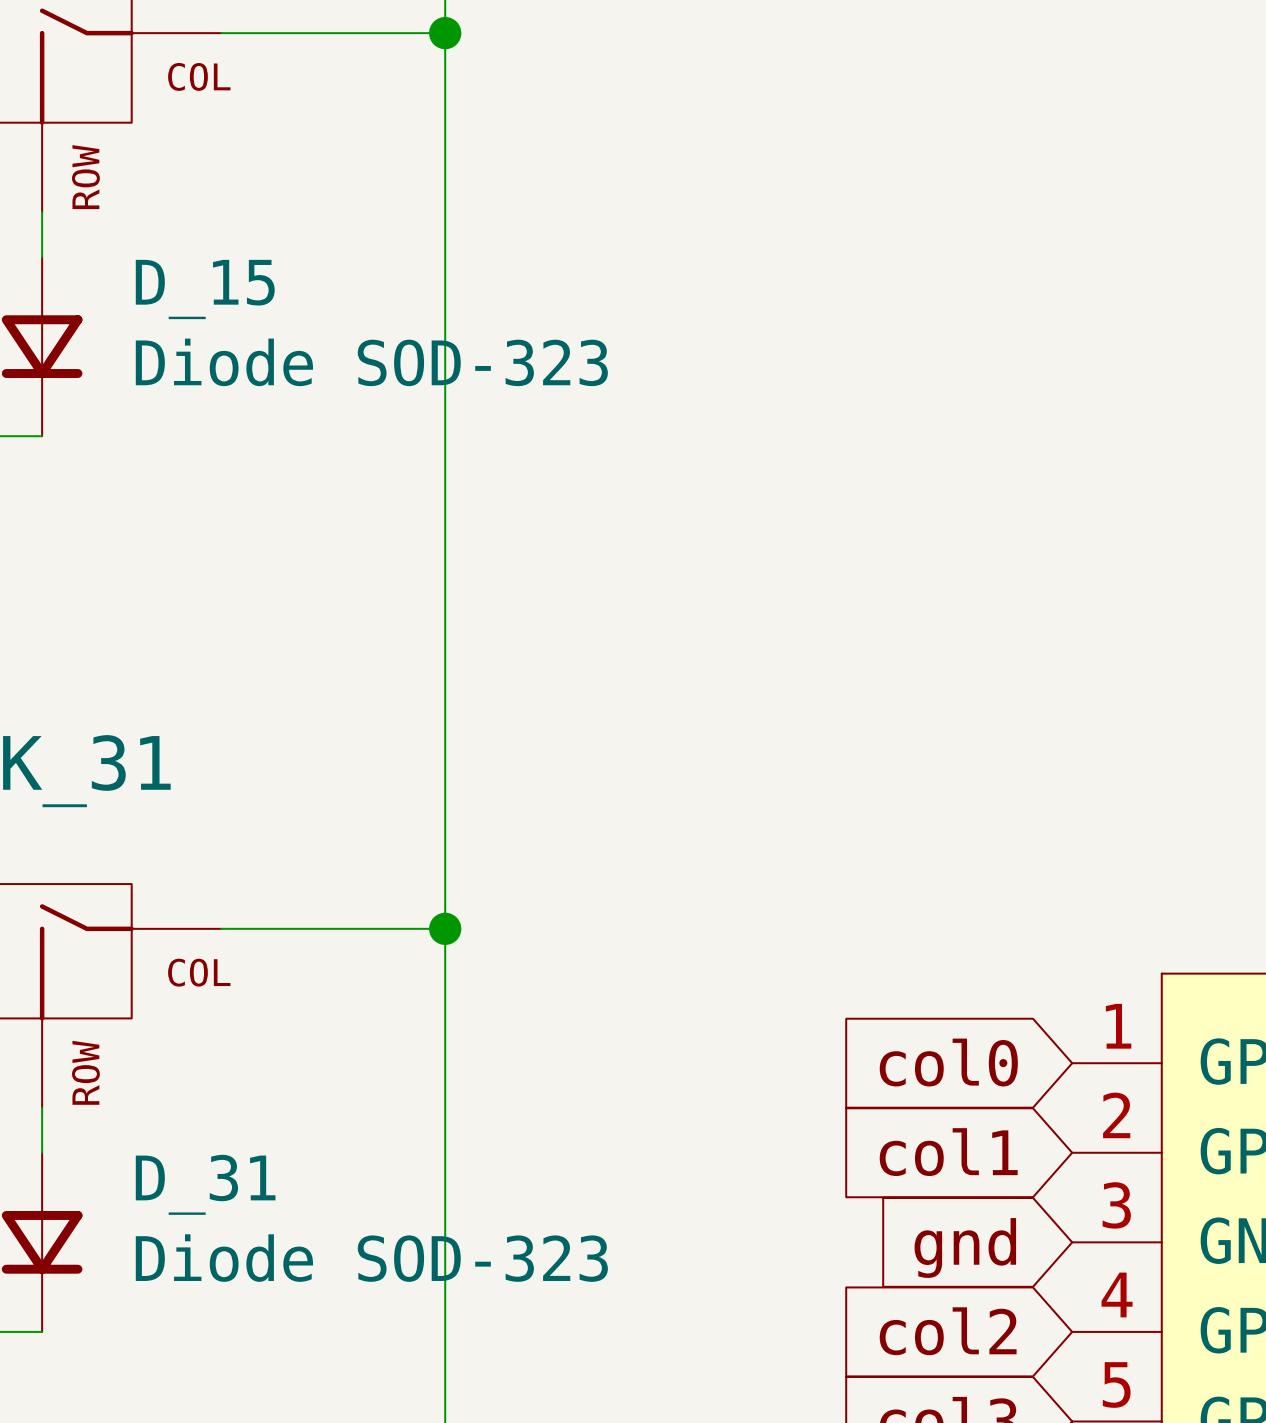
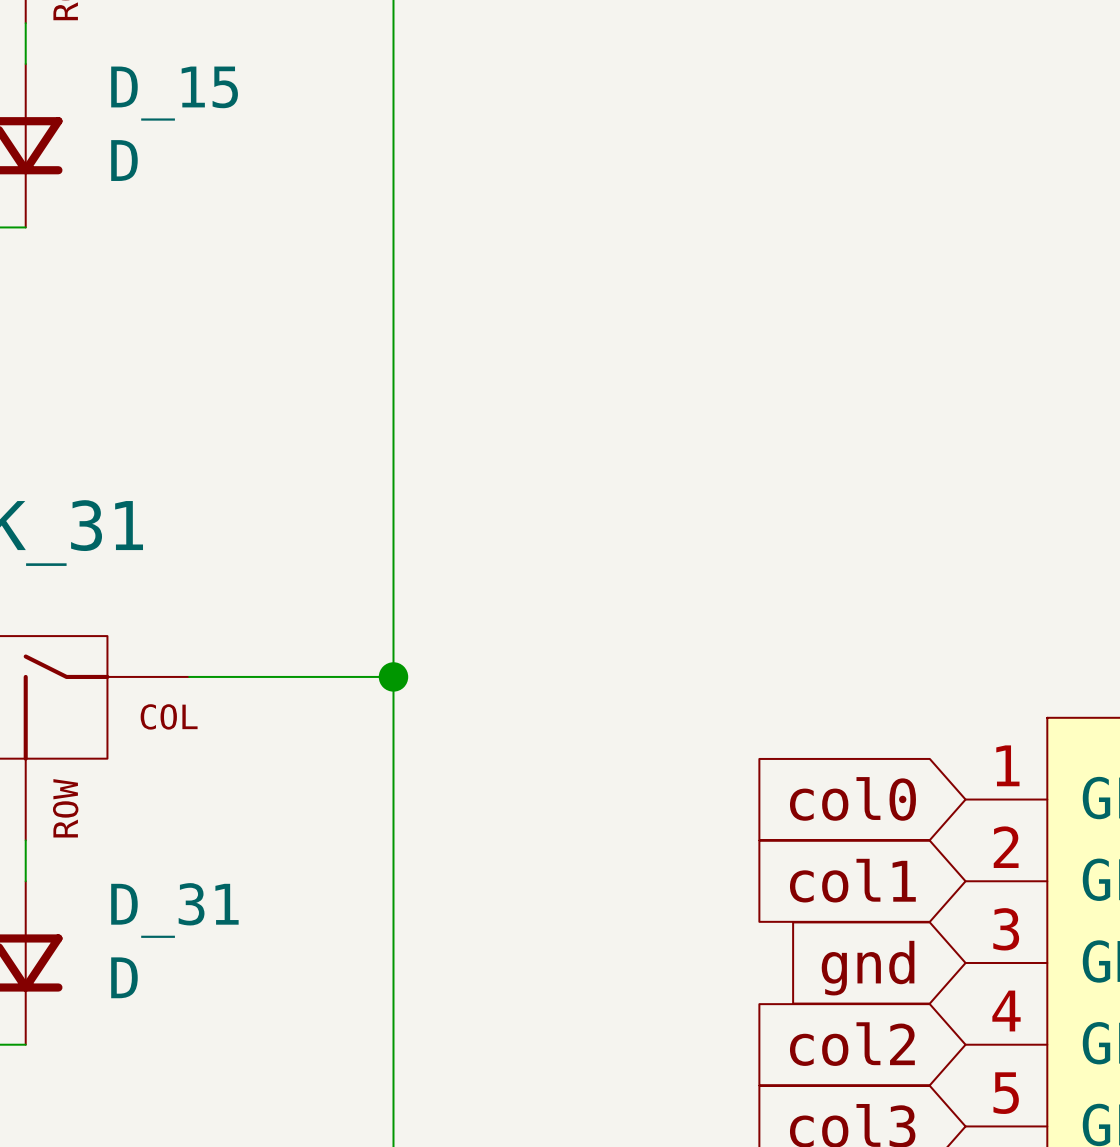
D_15 value: Diode SOD-323 (371, 362) -> D (124, 160)
D_31 value: Diode SOD-323 (371, 1258) -> D (124, 977)

